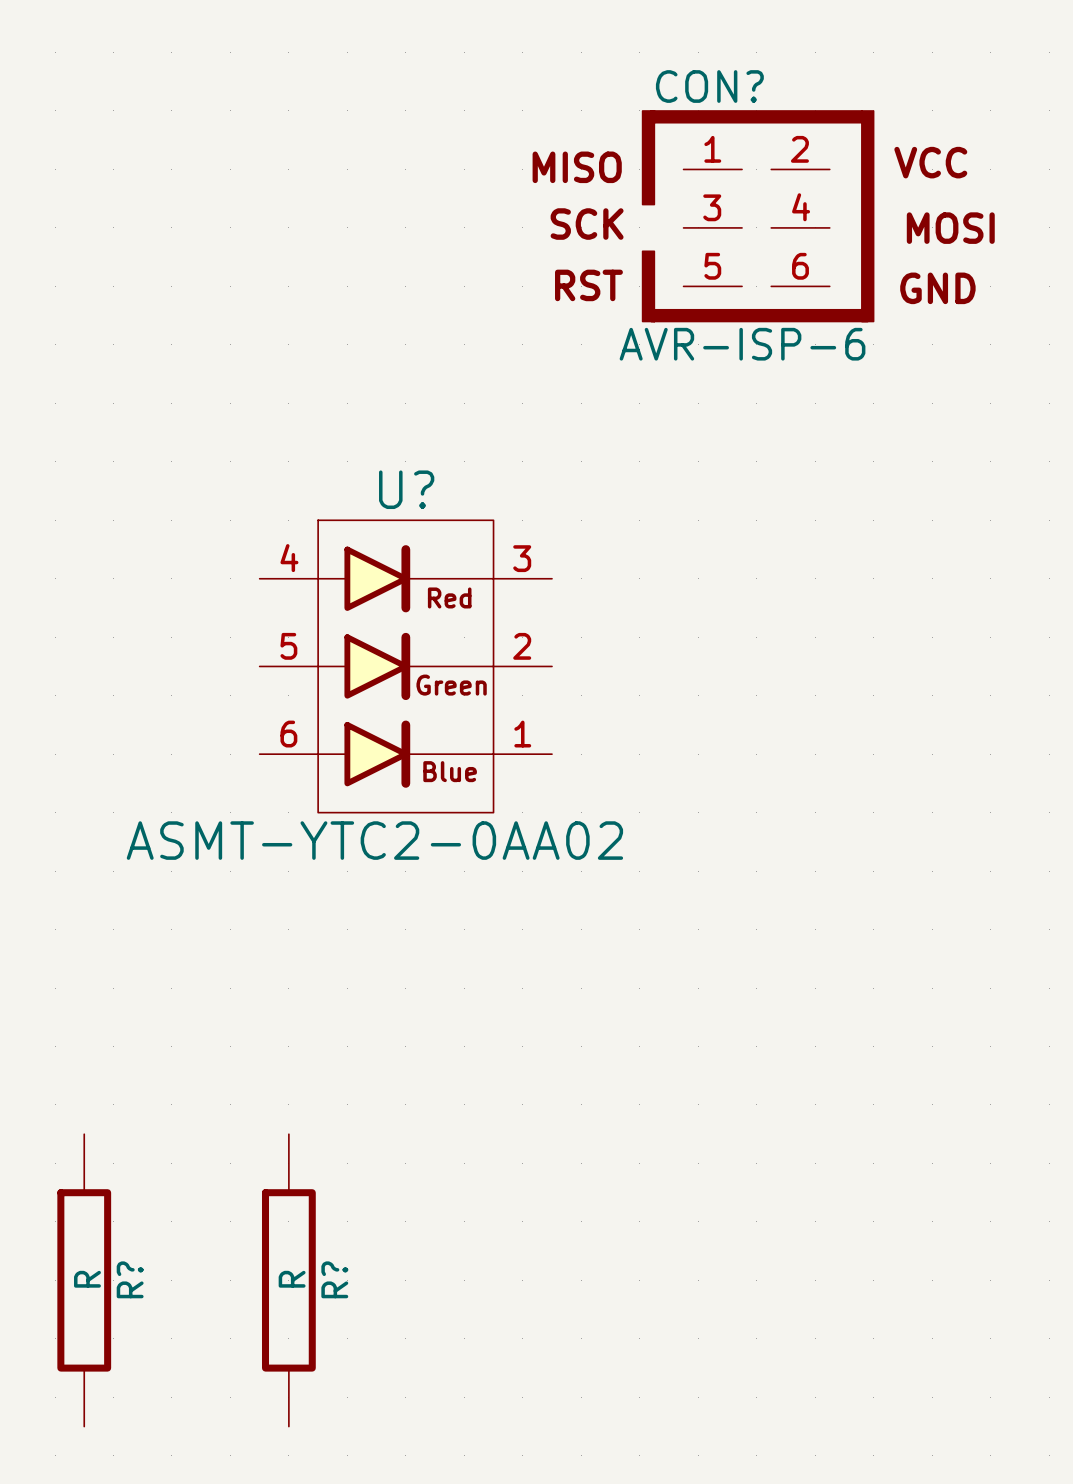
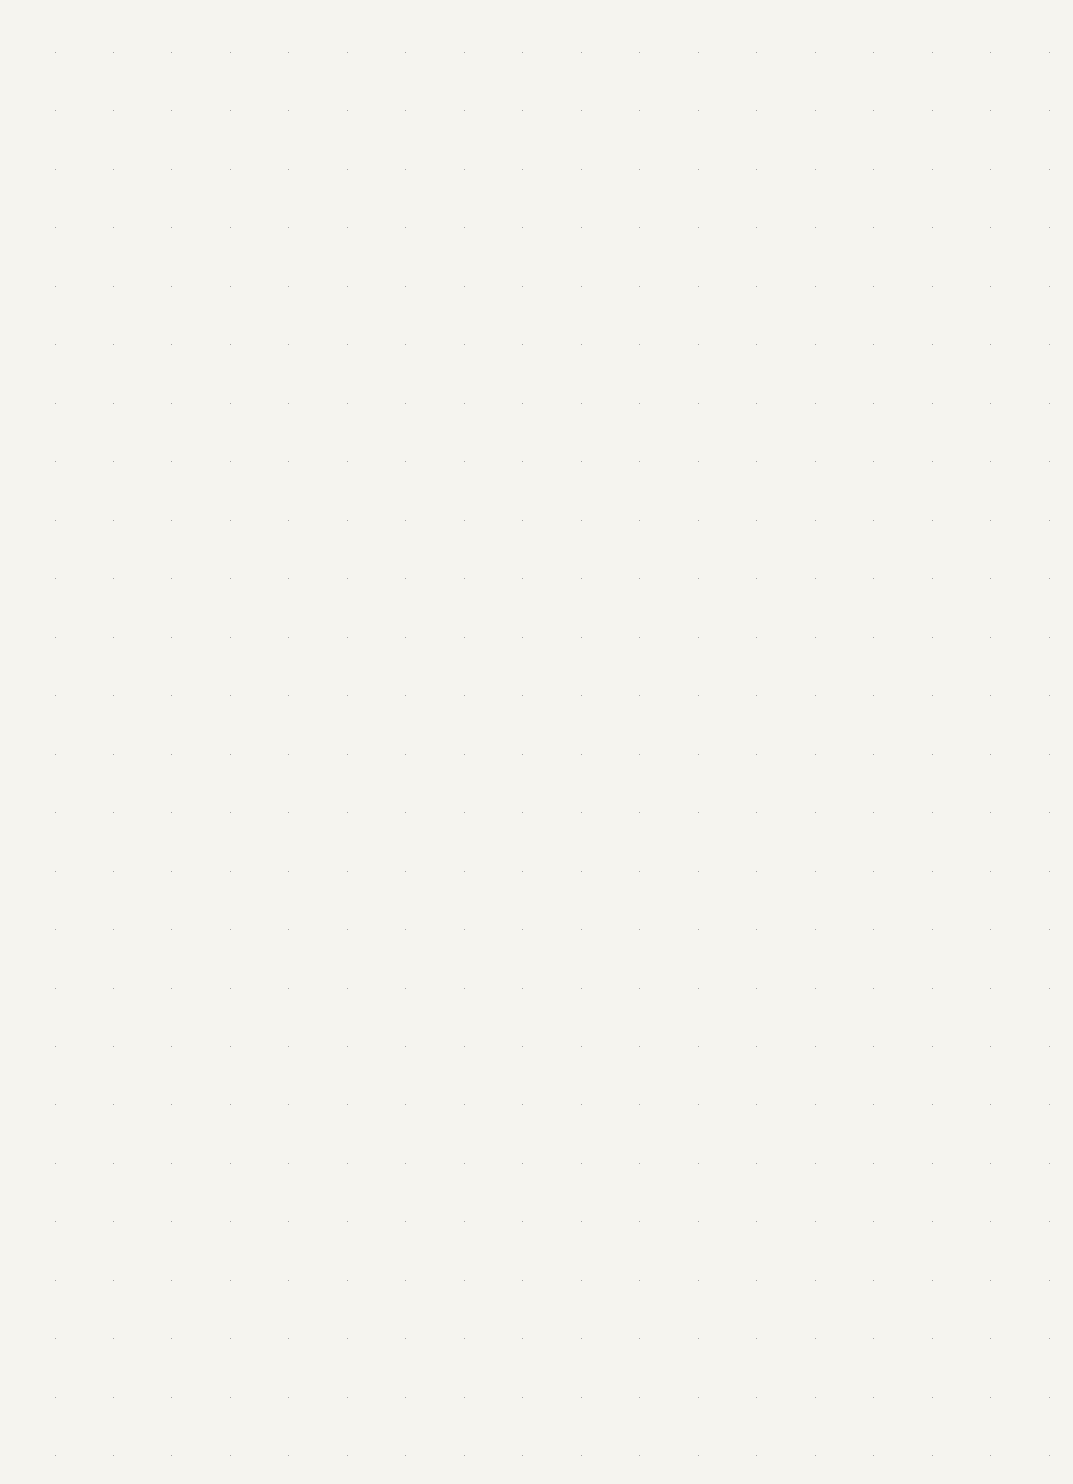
CON?: AVR-ISP-6 (758, 216) -> none
U?: ASMT-YTC2-0AA02 (405, 666) -> none
R?: R (84, 1280) -> none
R?: R (288, 1280) -> none

